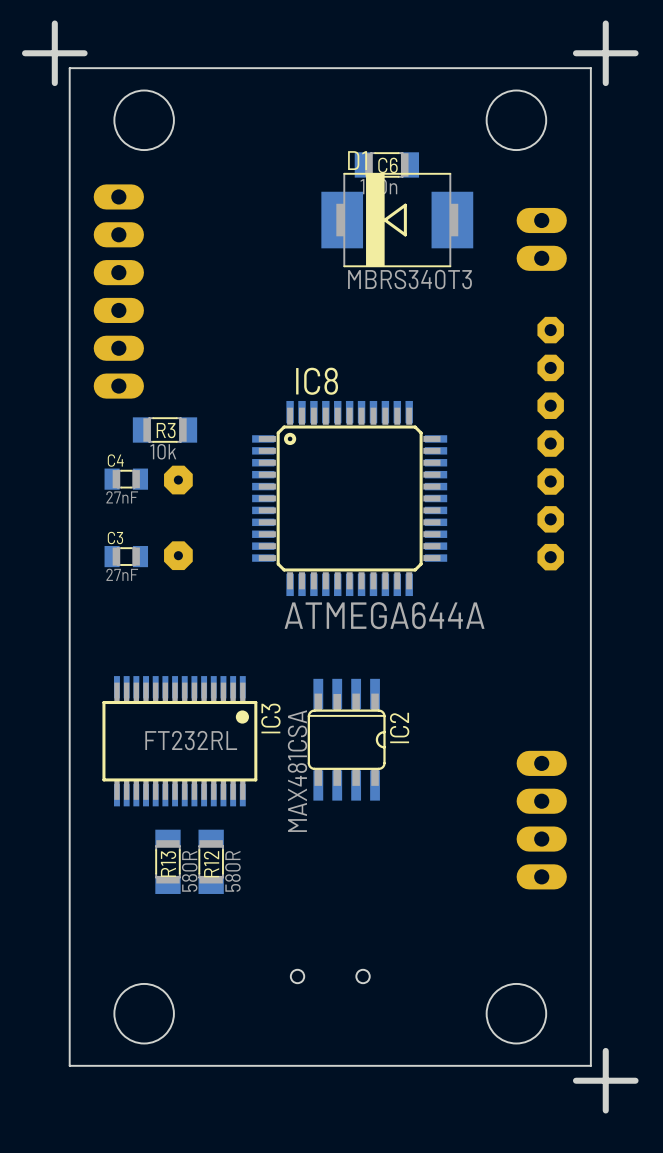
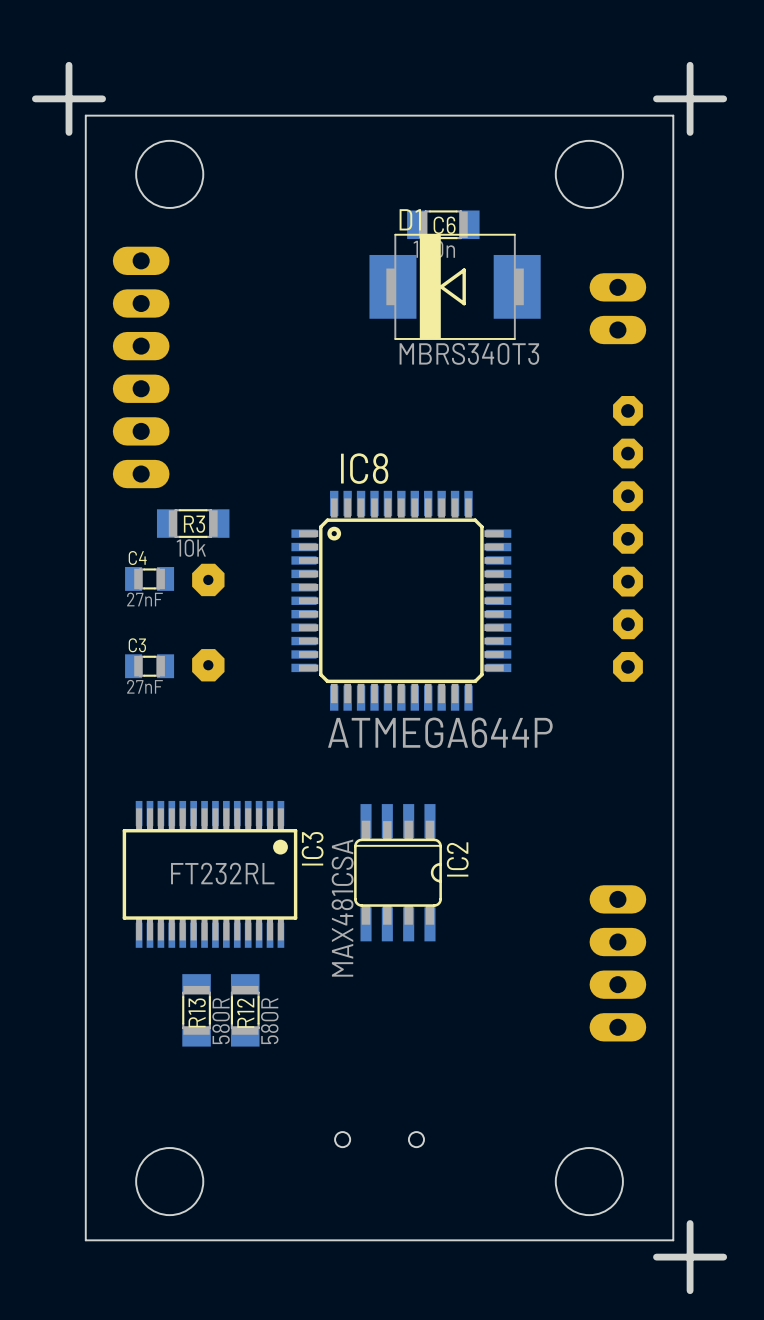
IC8 value: ATMEGA644A (384, 615) -> ATMEGA644P (440, 732)

